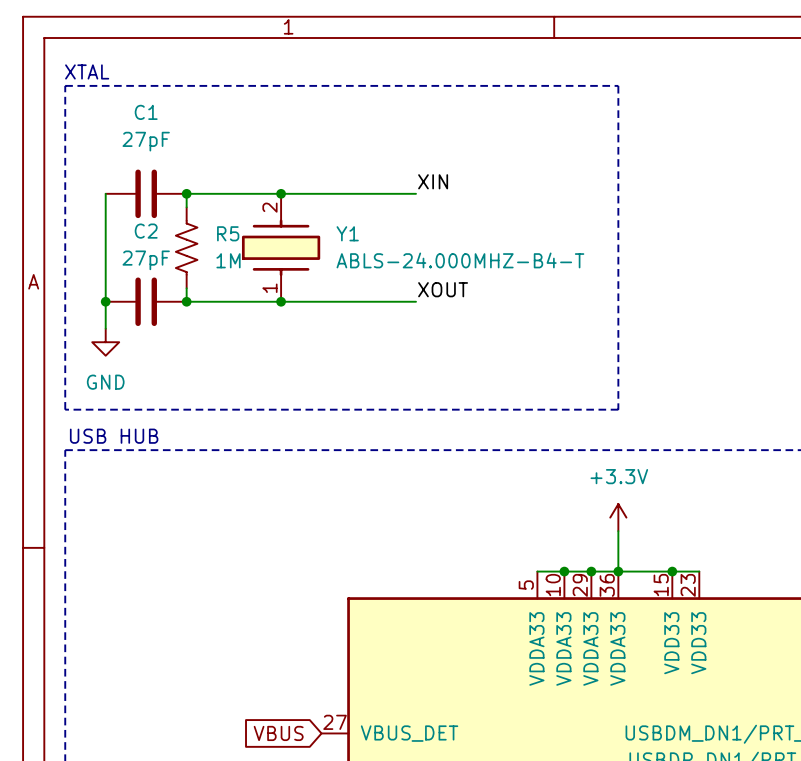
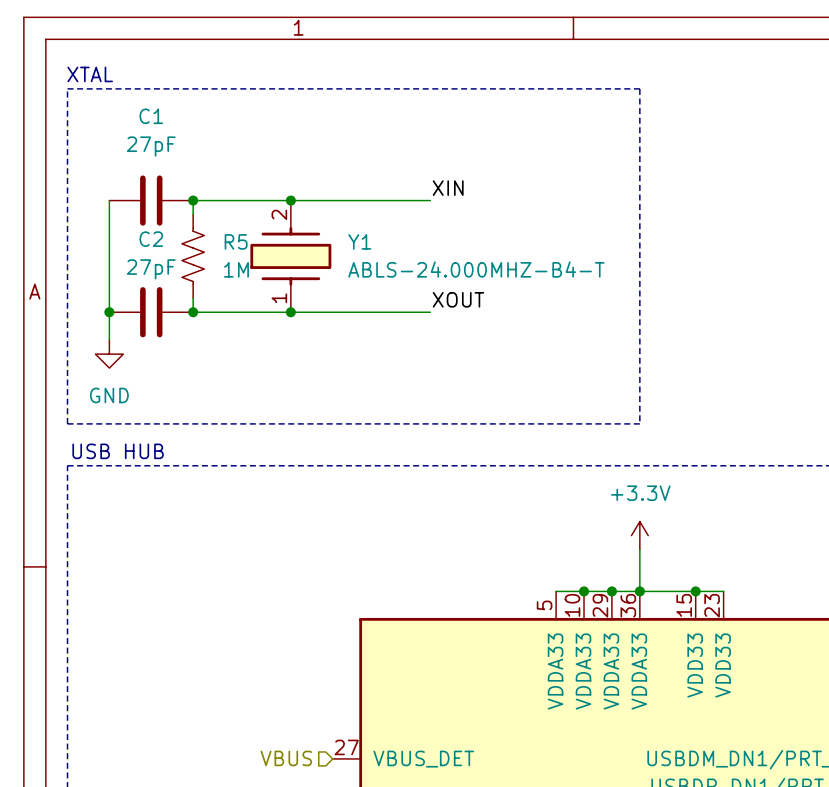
hierarchical label: none -> VBUS (286, 758)
global label: VBUS (278, 733) -> none

